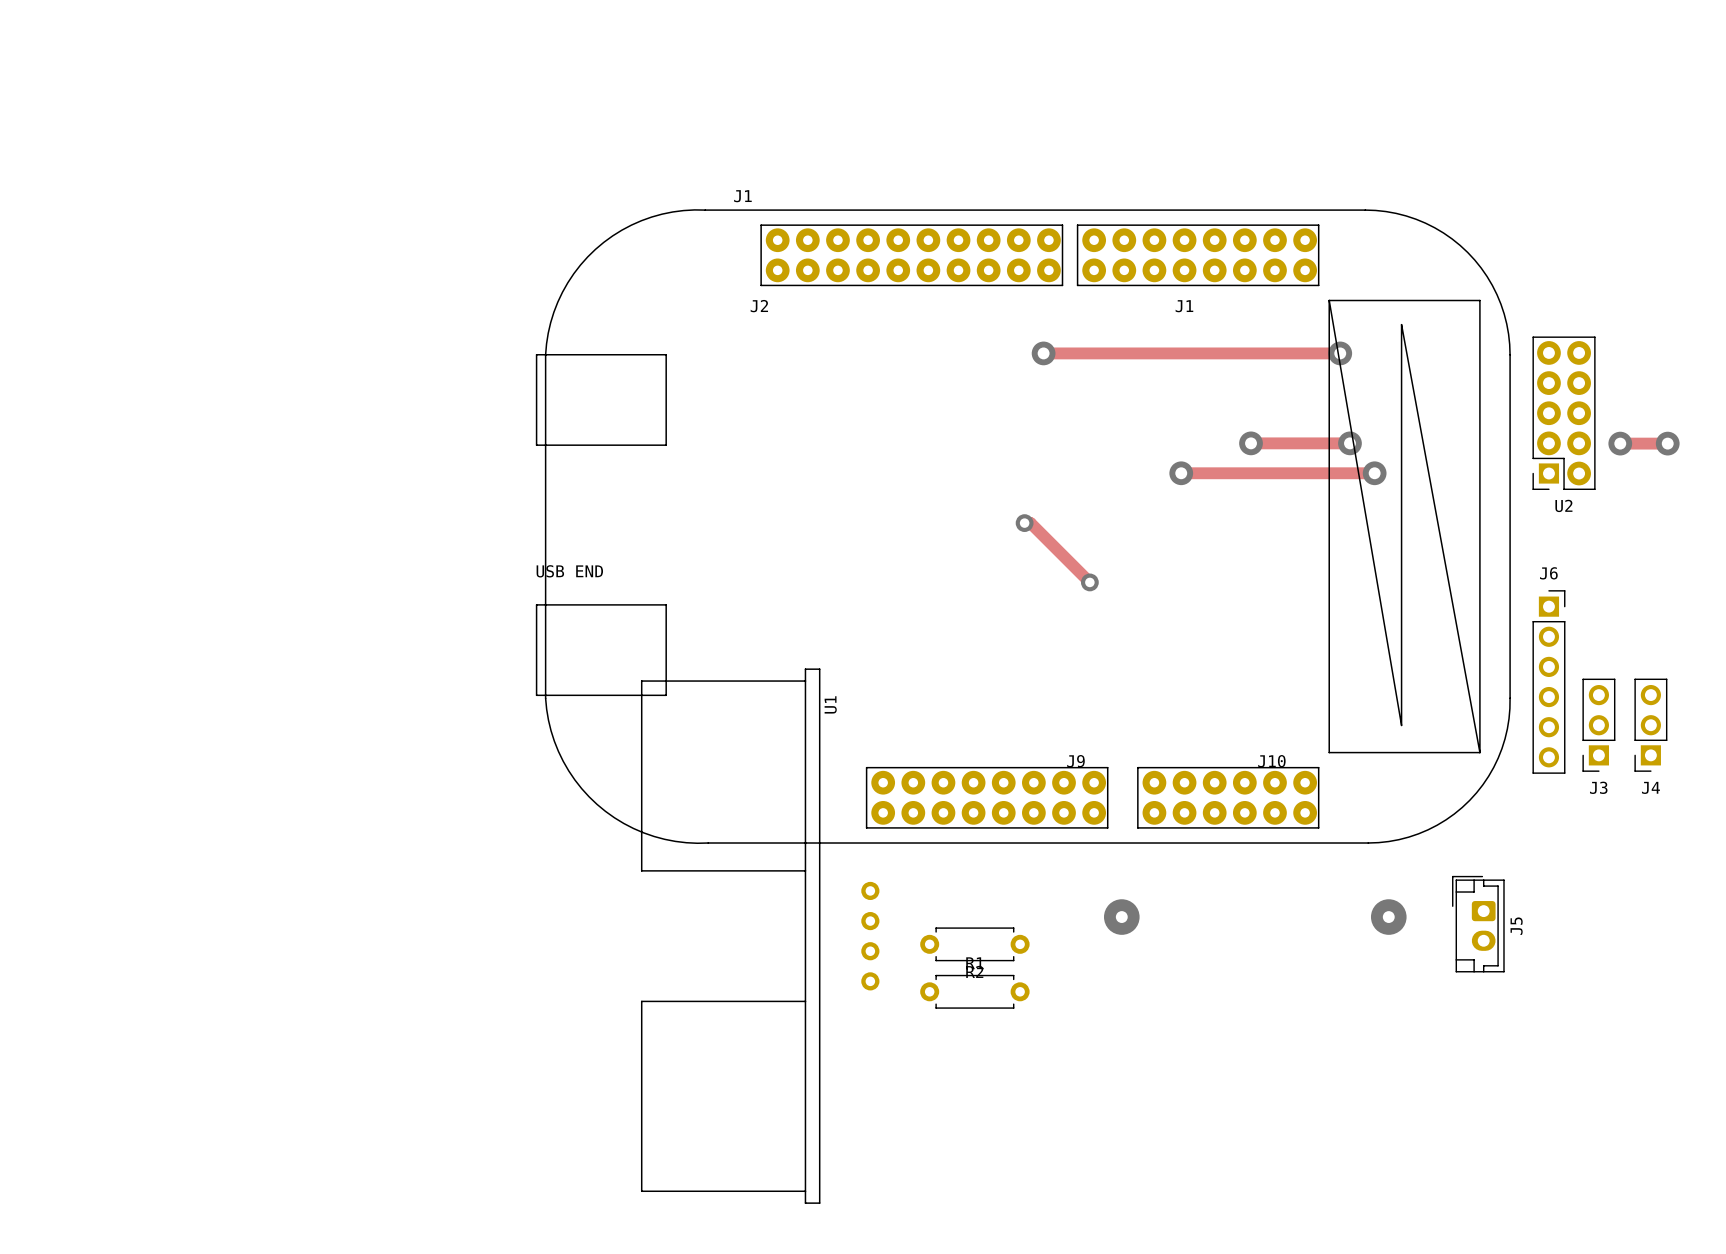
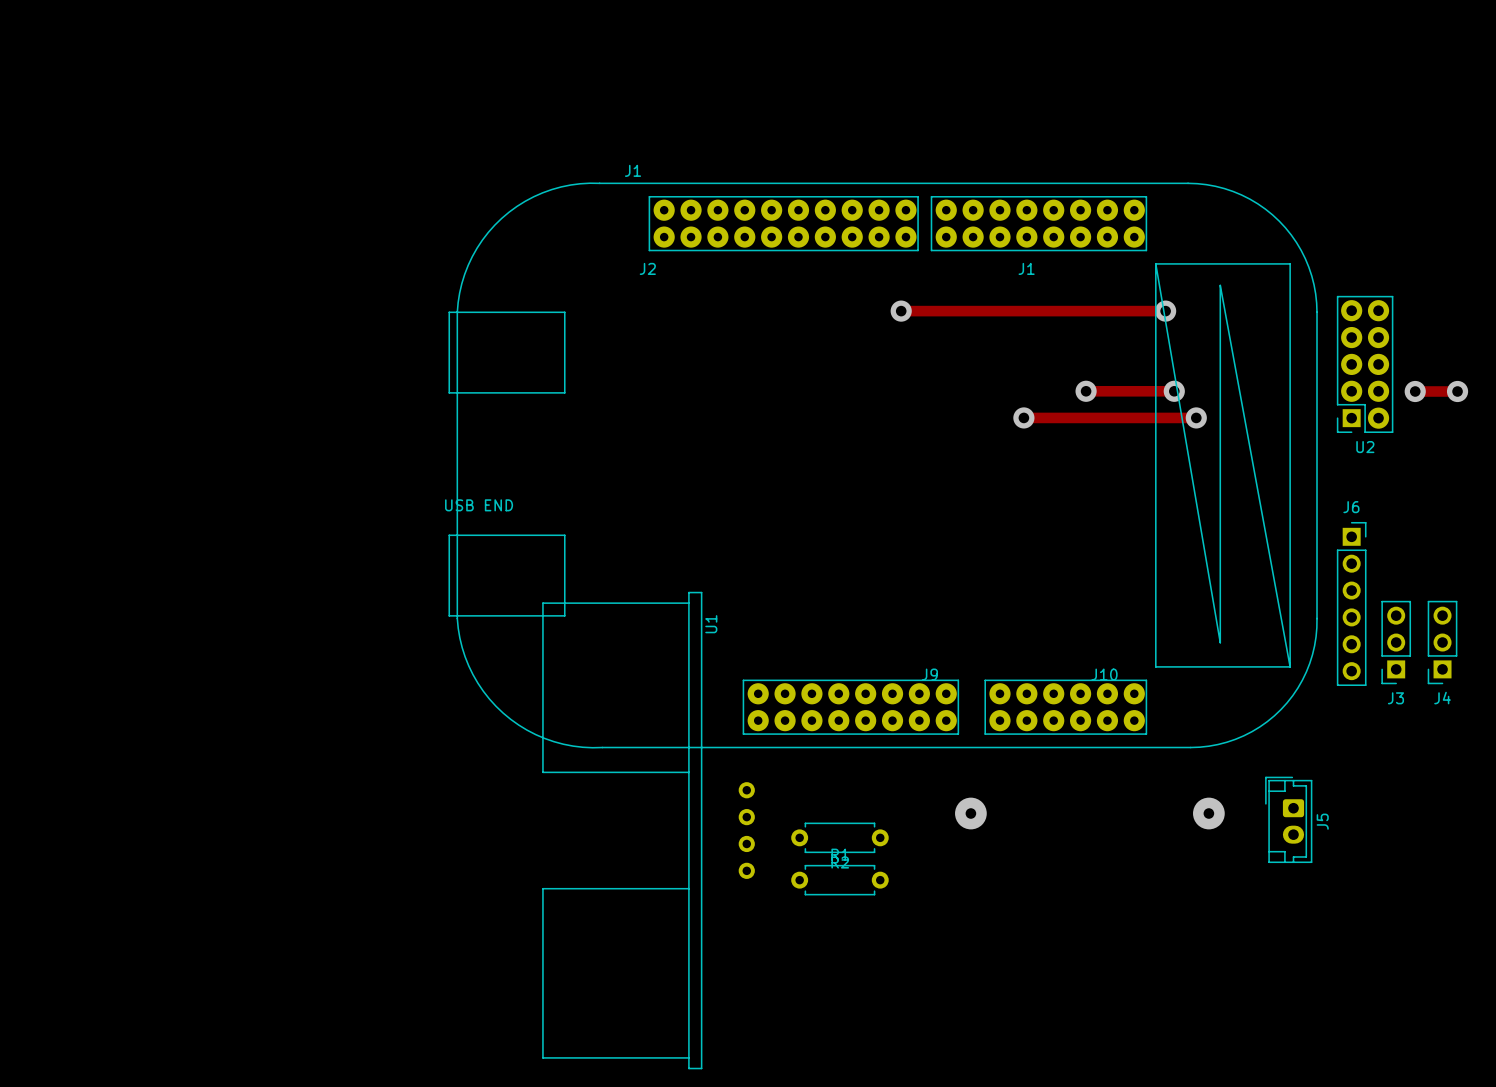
track: (1024, 523) (1030, 523) (1089, 582) -> none
via: (1024, 523) -> none
via: (1089, 582) -> none

